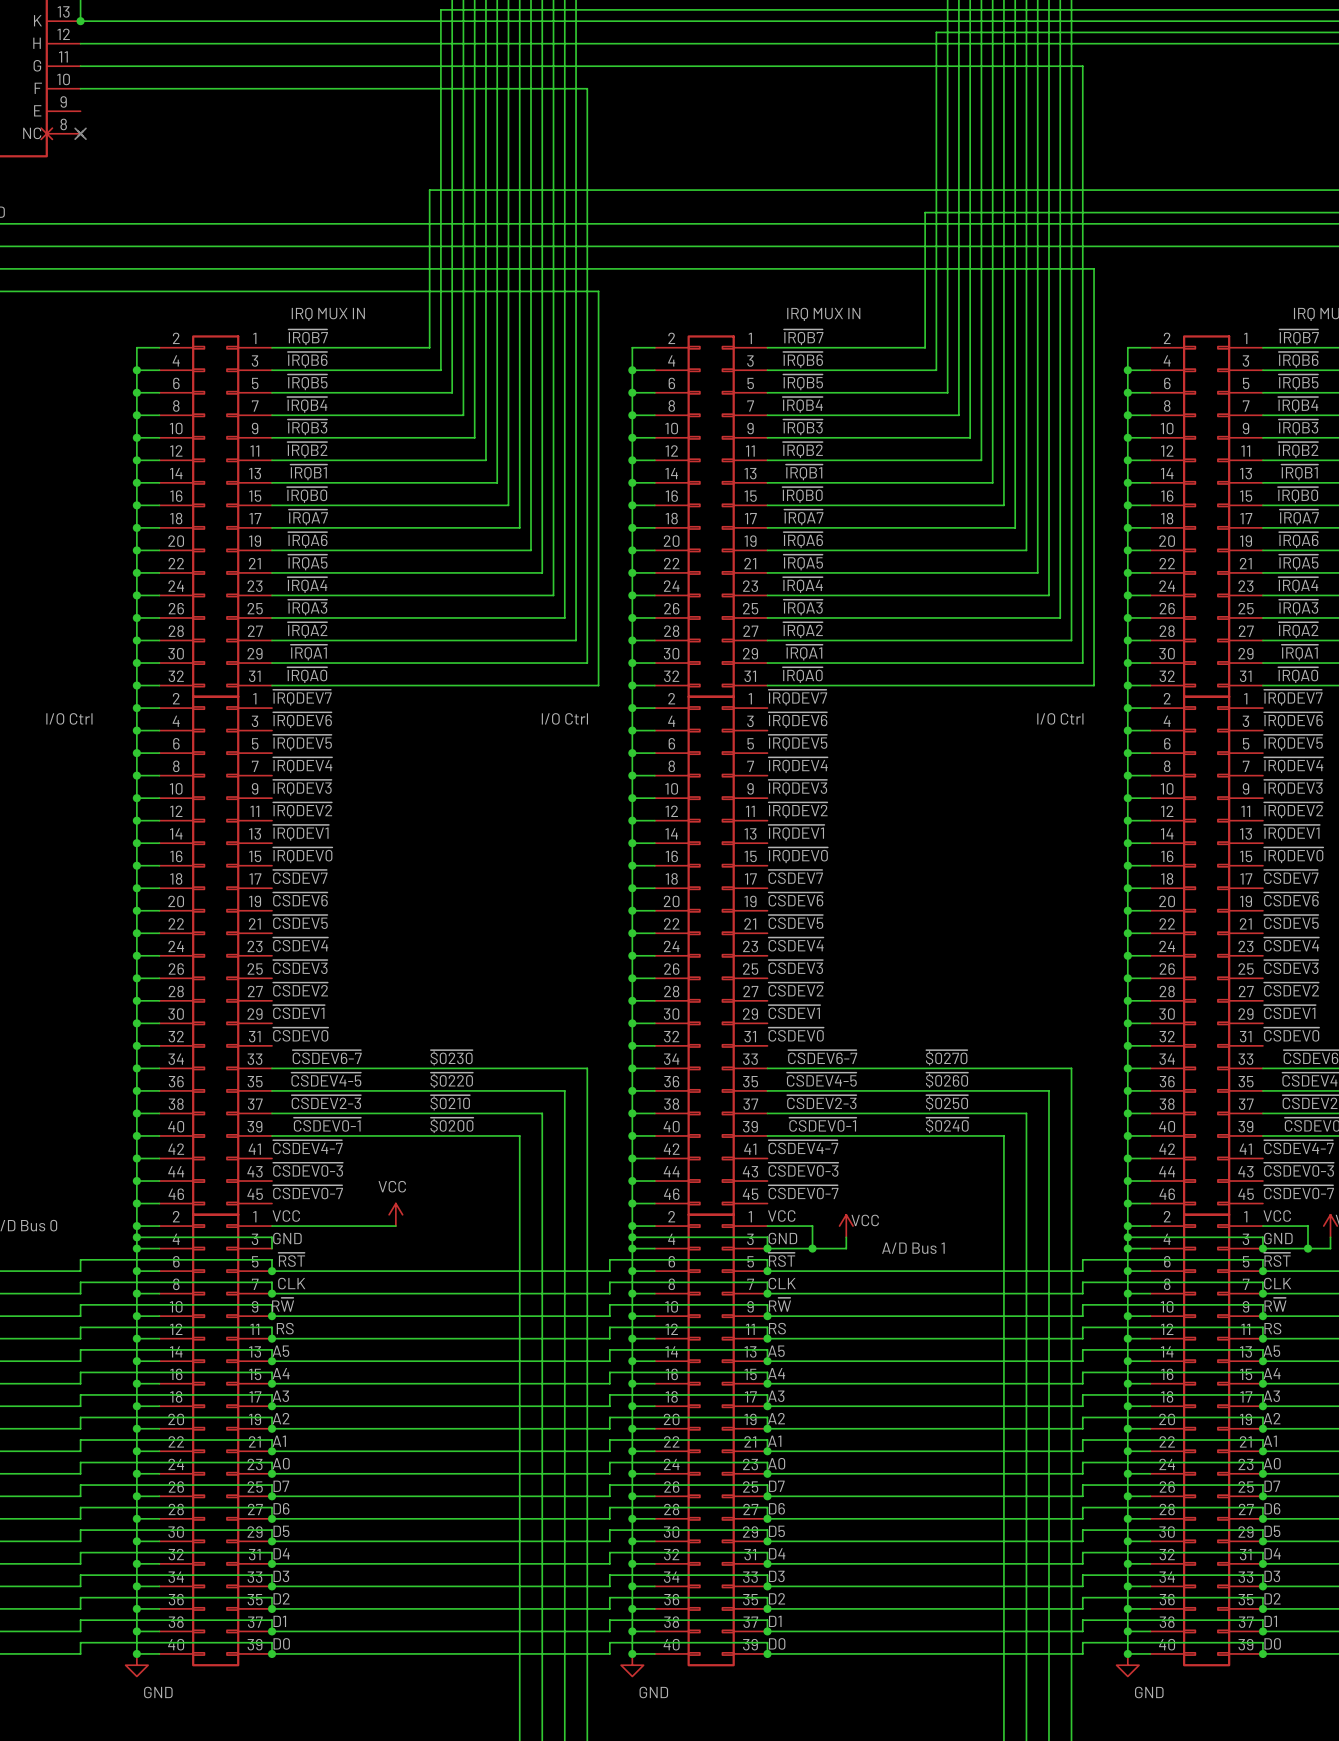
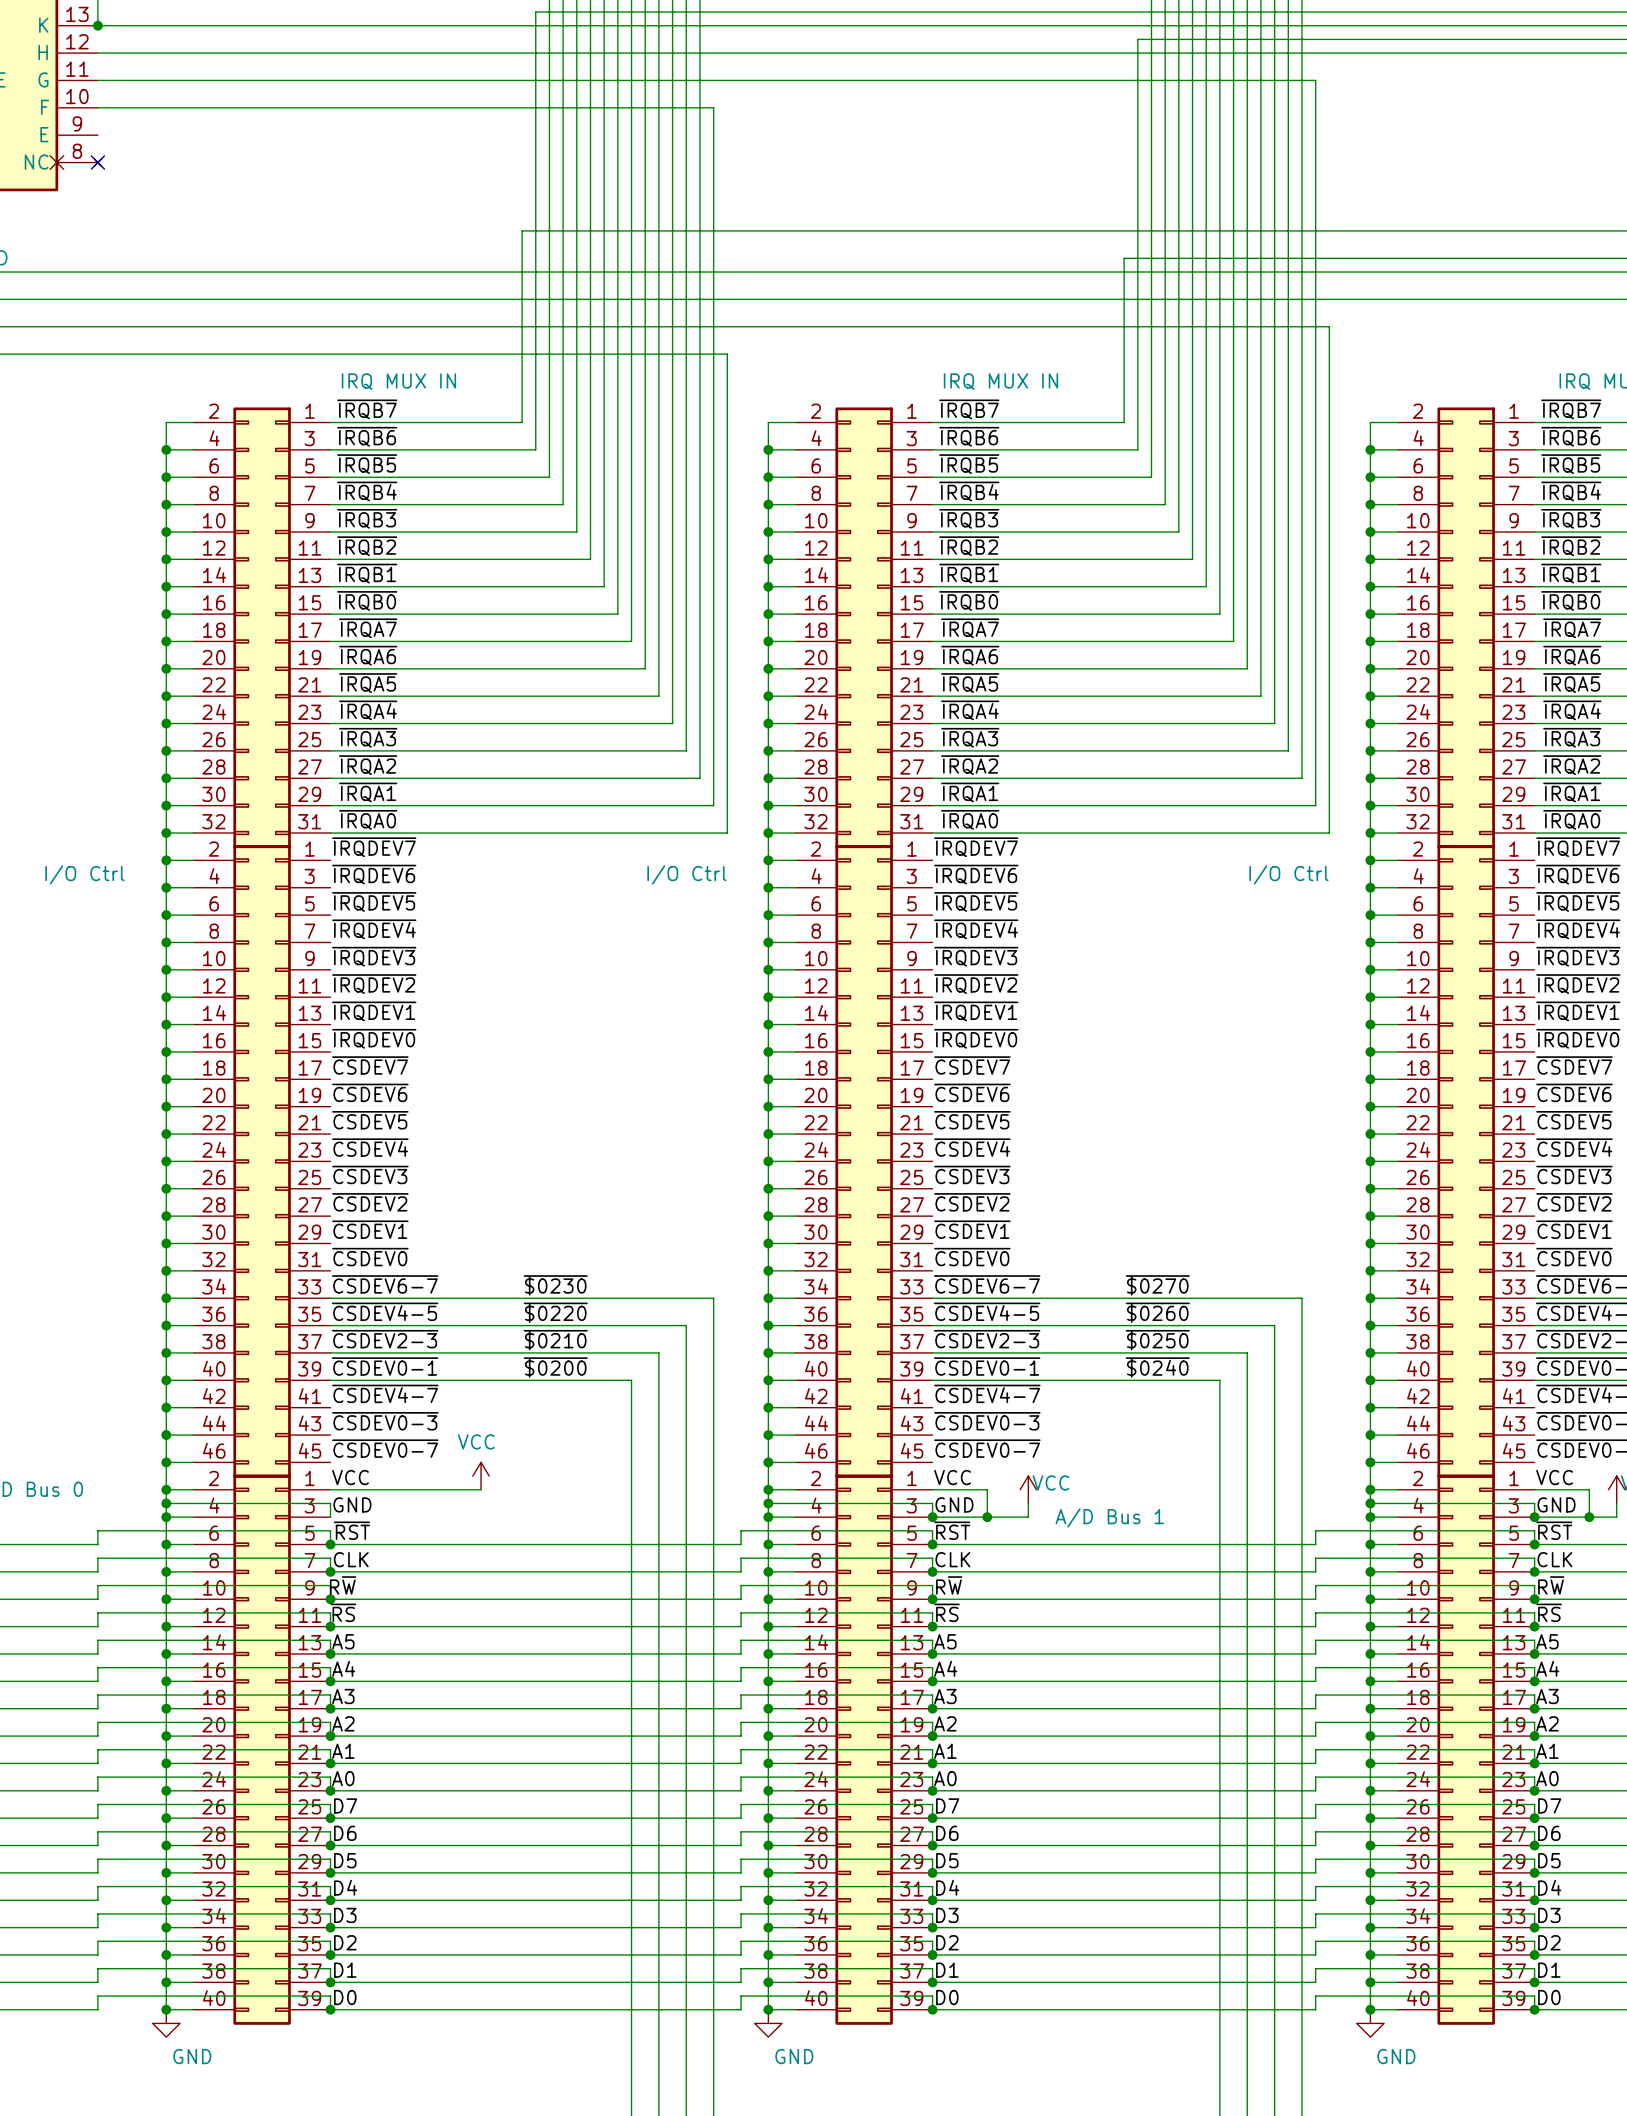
label: RS (285, 1328) -> ~{RS} (343, 1612)
label: RS (777, 1328) -> ~{RS} (947, 1612)
label: RS (1272, 1328) -> ~{RS} (1549, 1612)

